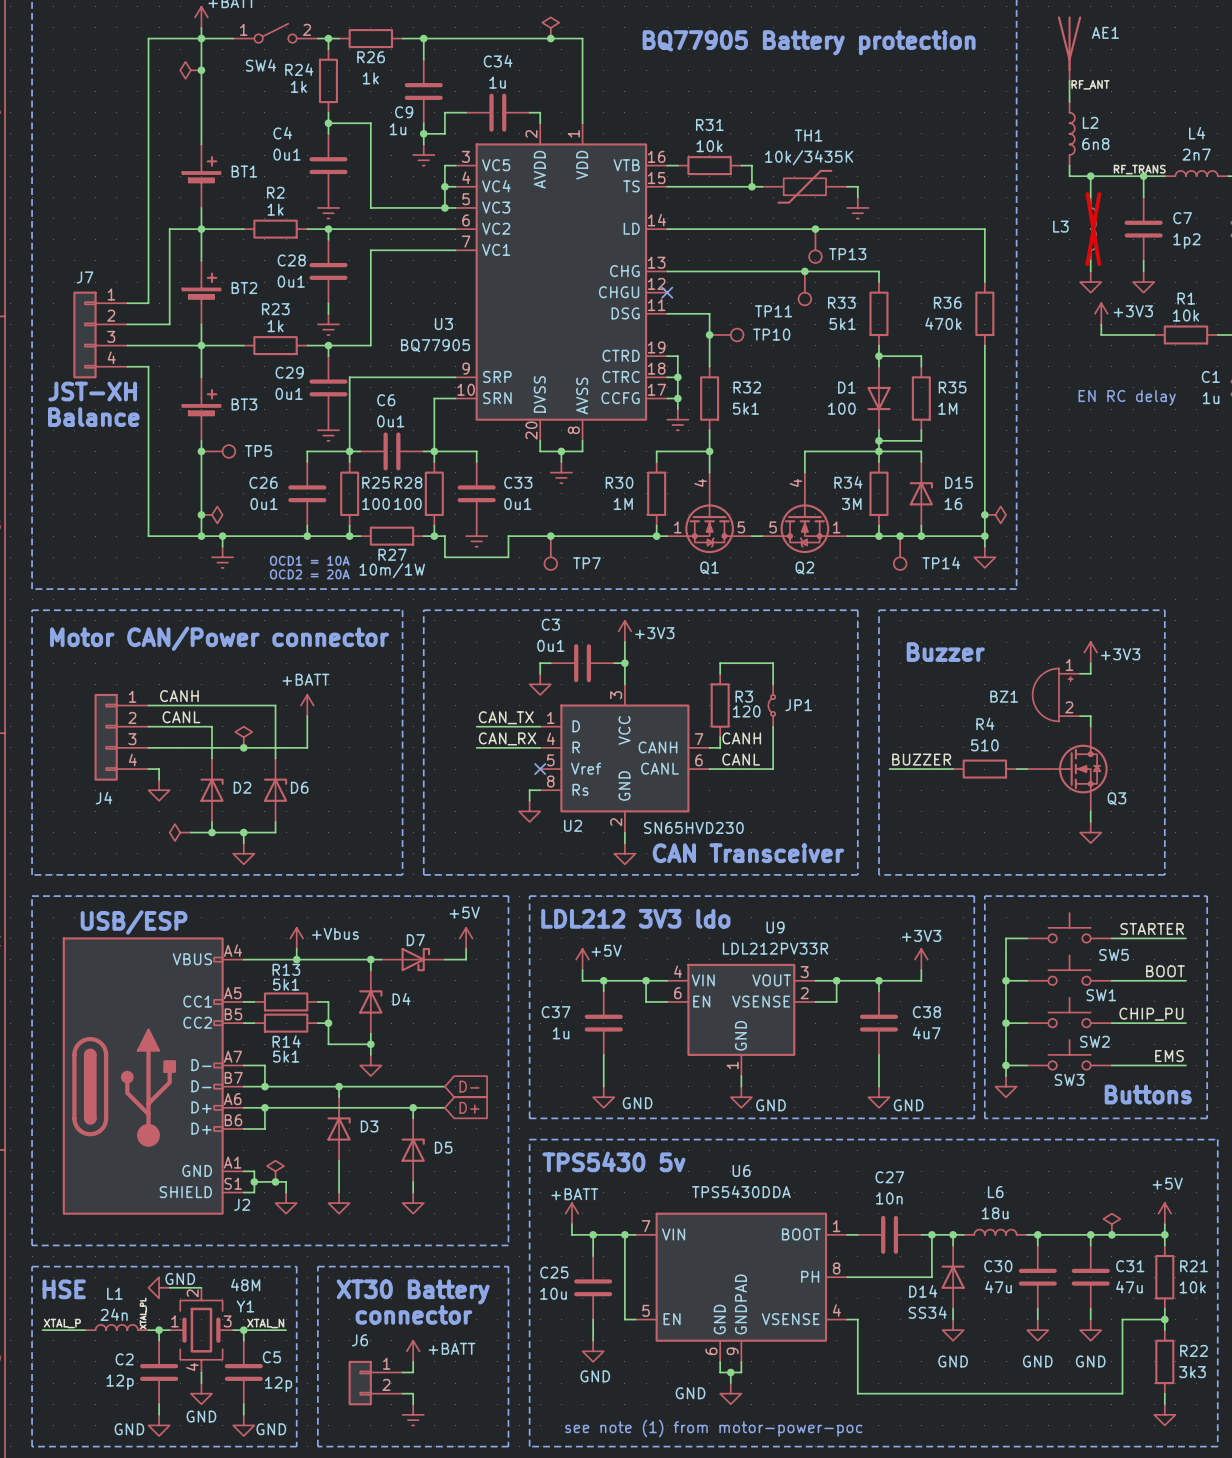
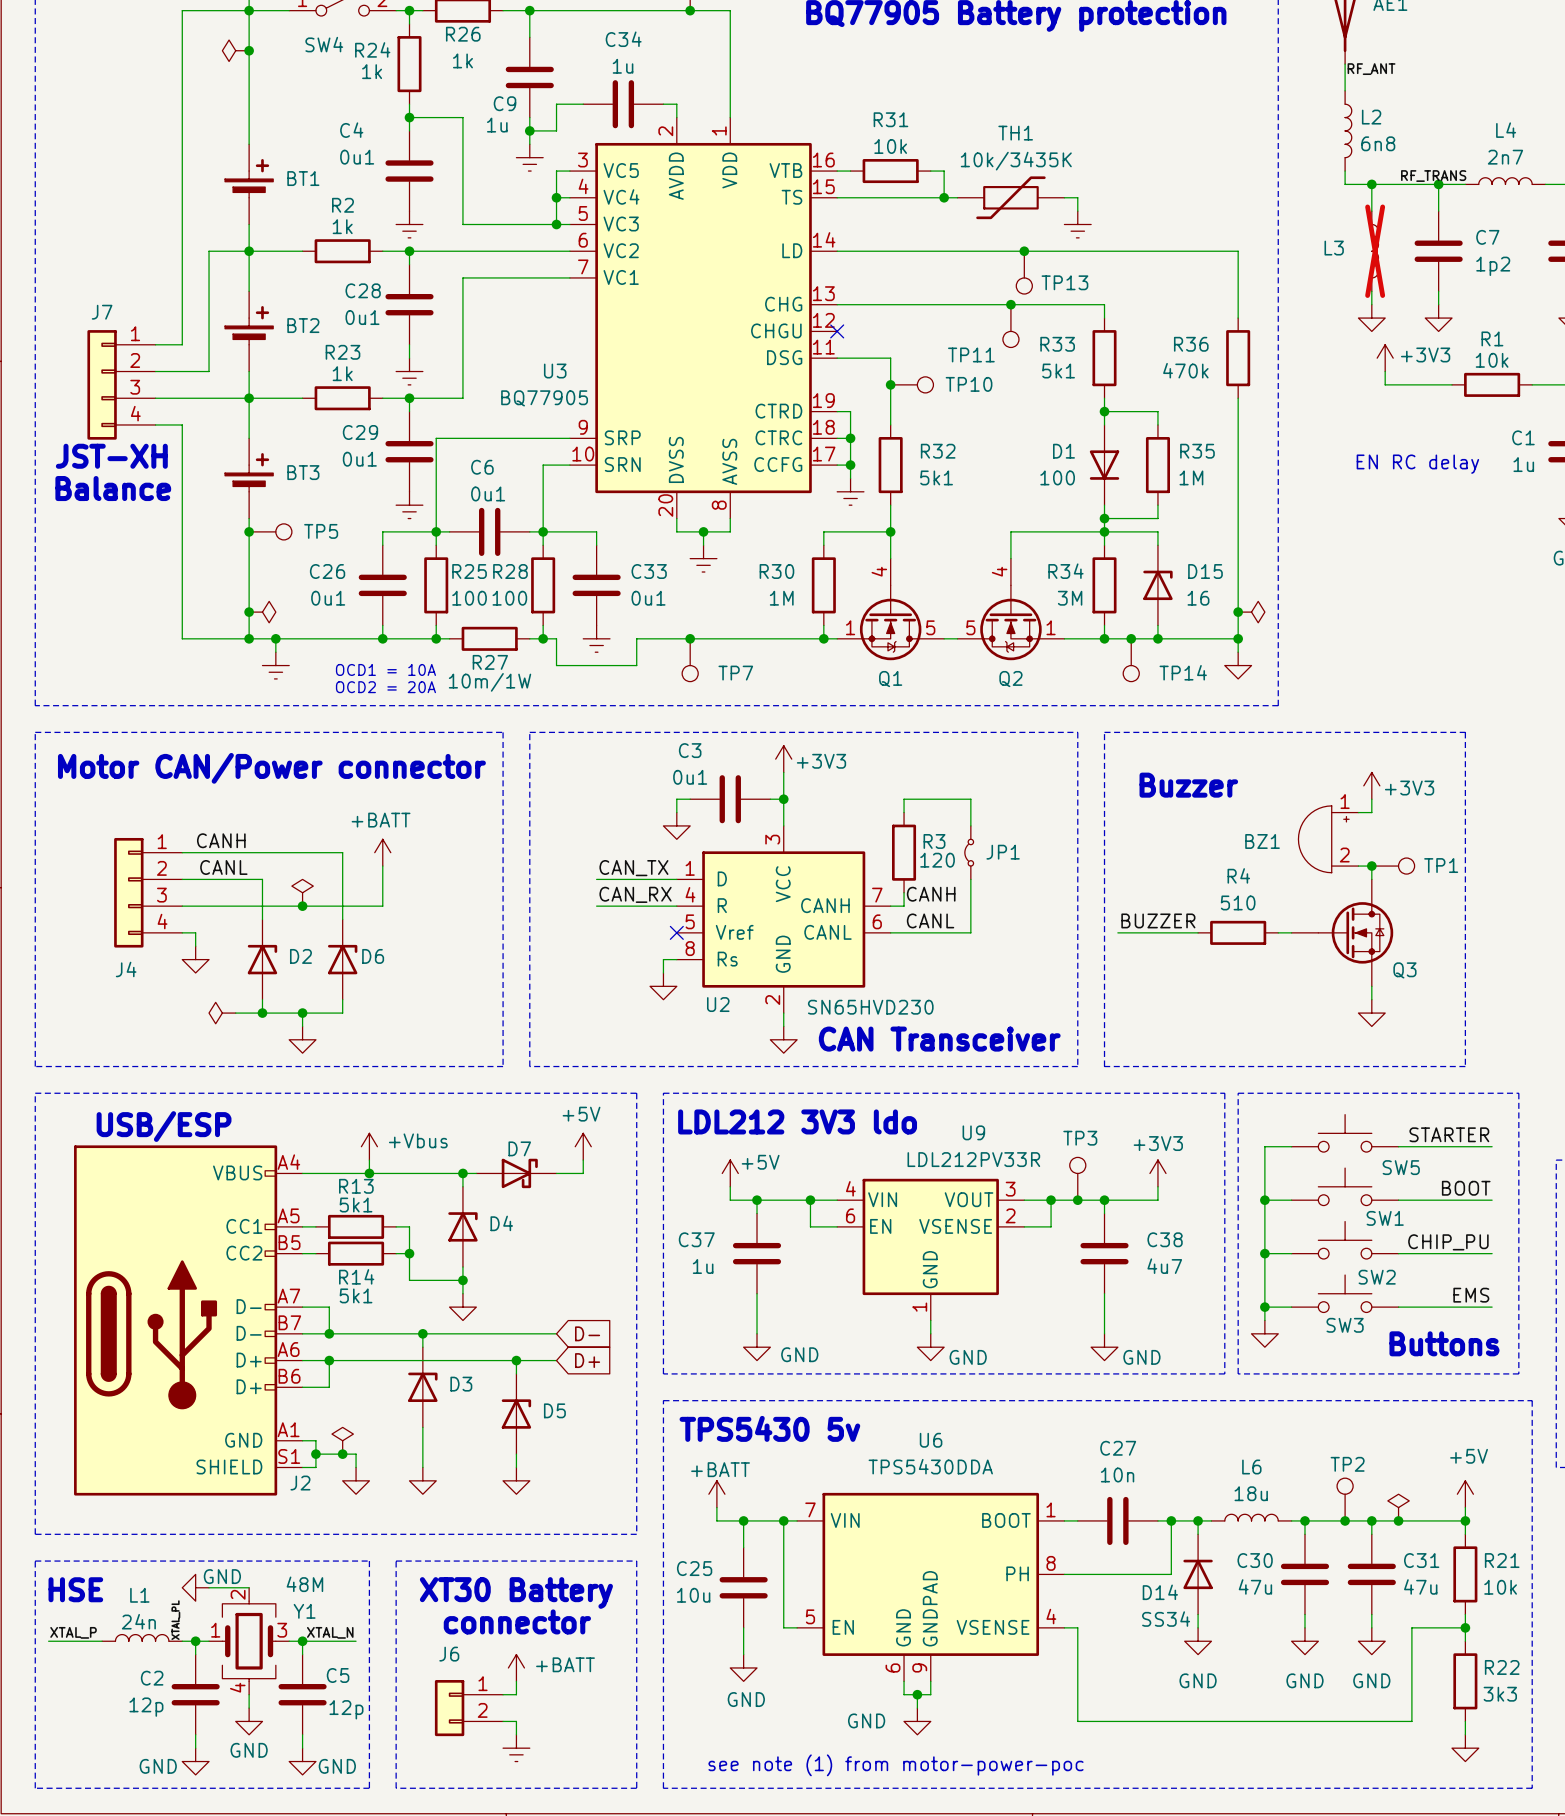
junction: none -> (1371, 866)
TP1: none -> (1393, 866)
TP3: none -> (1077, 1178)
junction: none -> (1077, 1200)
TP2: none -> (1345, 1499)
junction: none -> (1345, 1520)

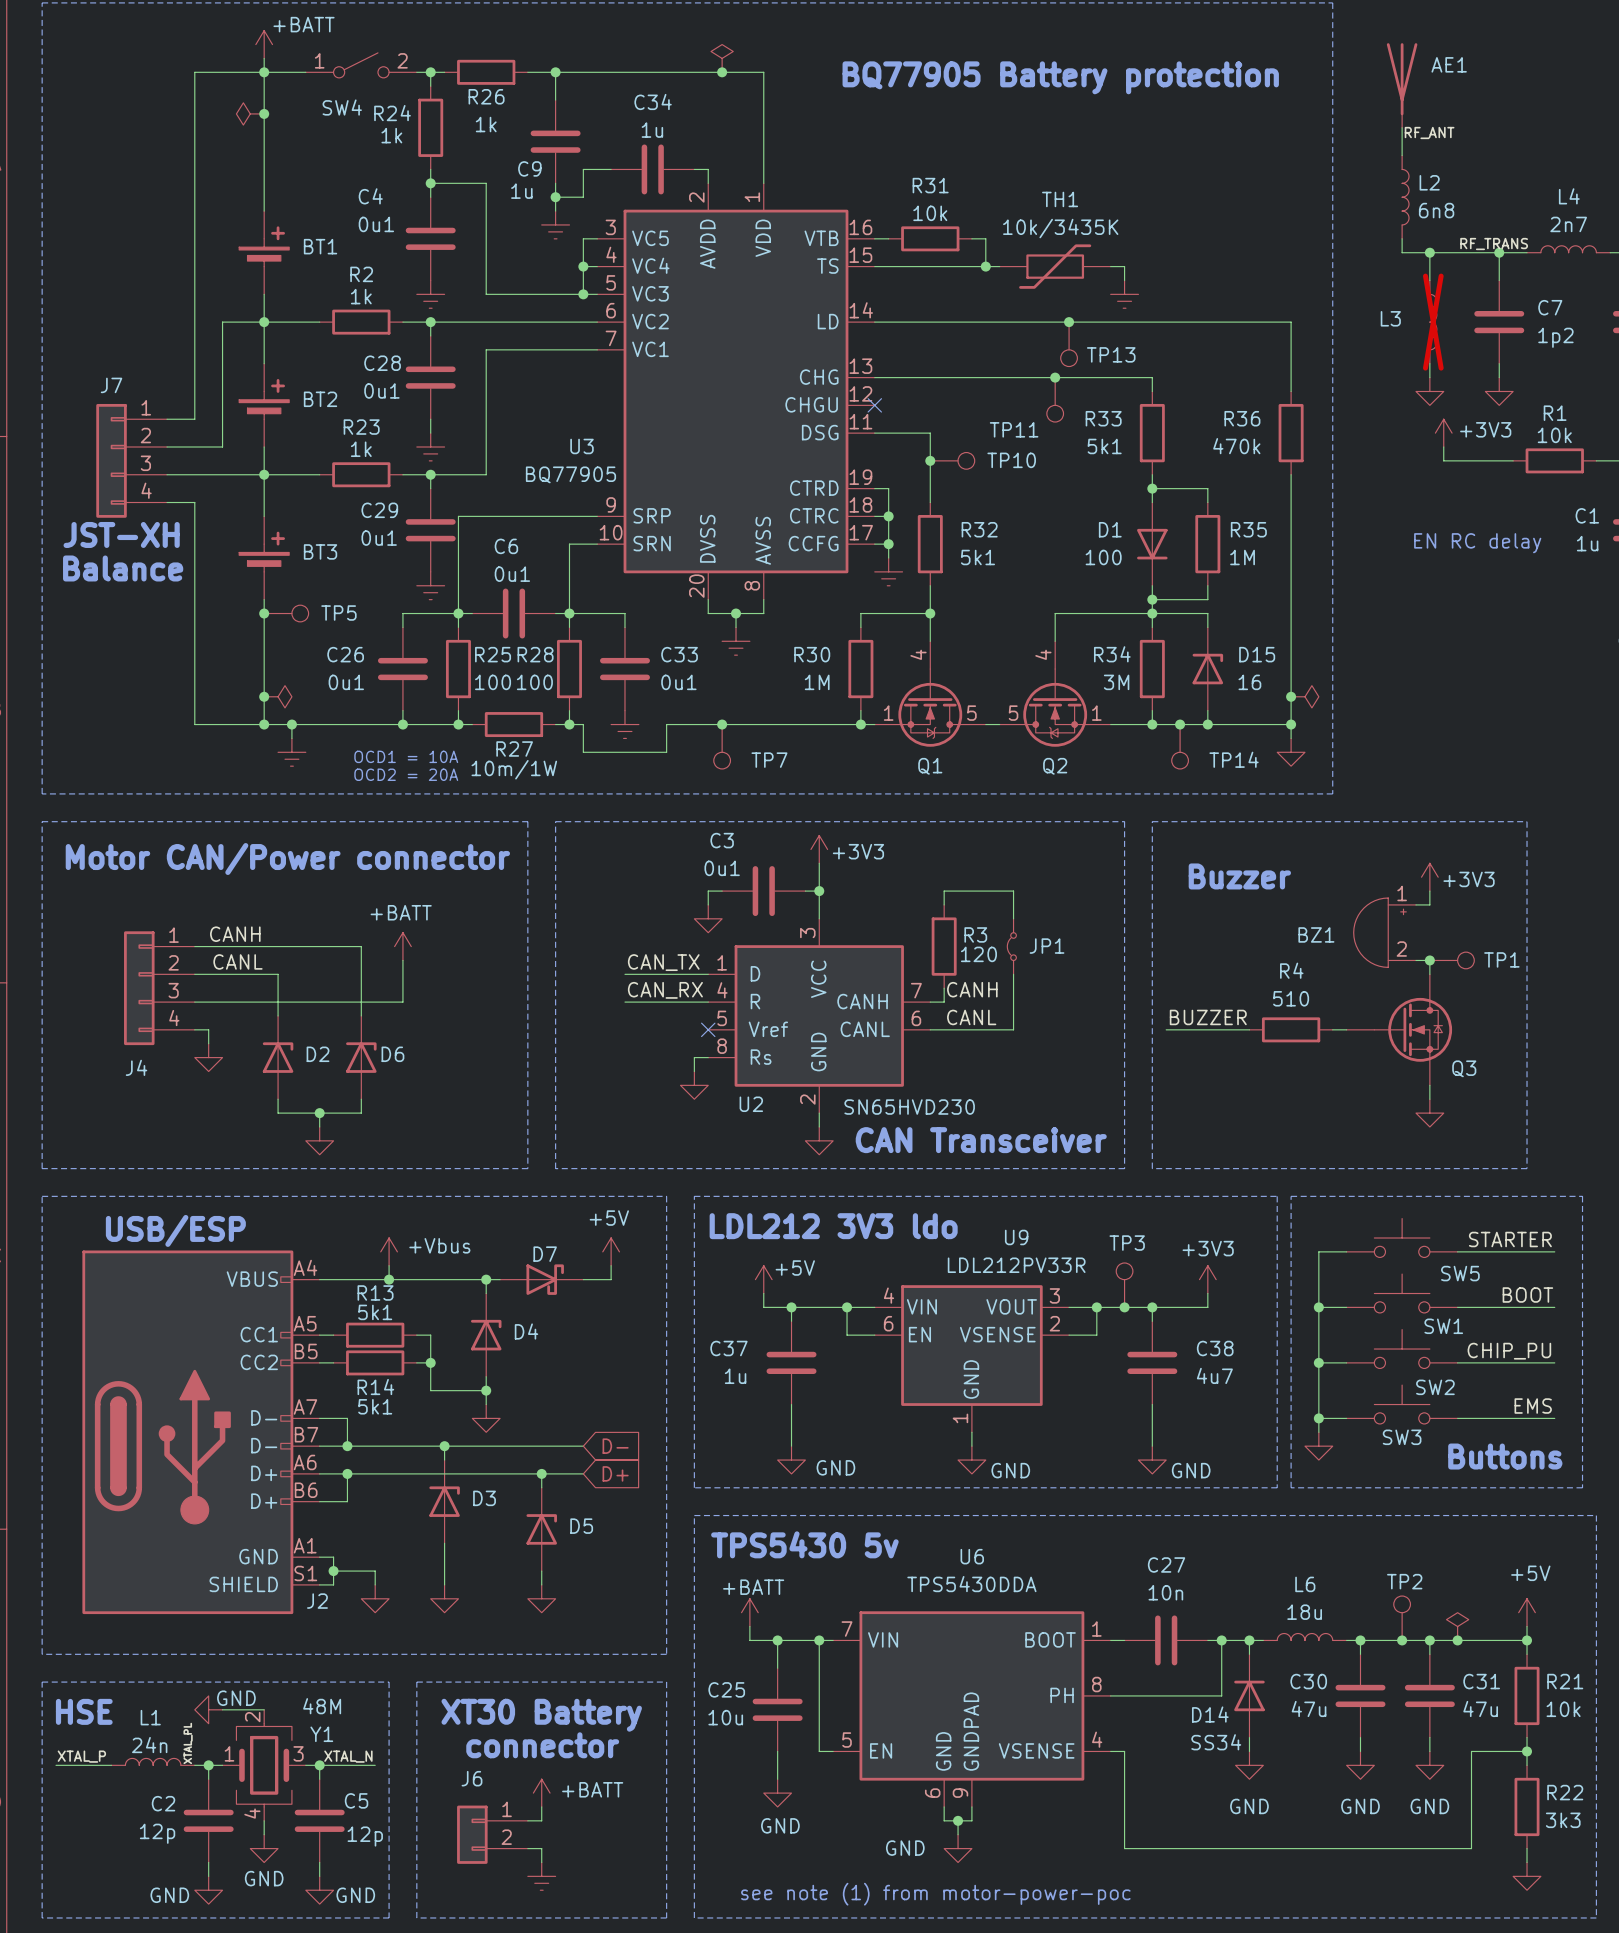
power symbol: (302, 892) -> none
junction: (302, 906) -> none
power symbol: (222, 1013) -> none
wire: (235, 1013) (262, 1013) -> none
junction: (262, 1013) -> none
power symbol: (342, 1440) -> none
junction: (342, 1454) -> none

